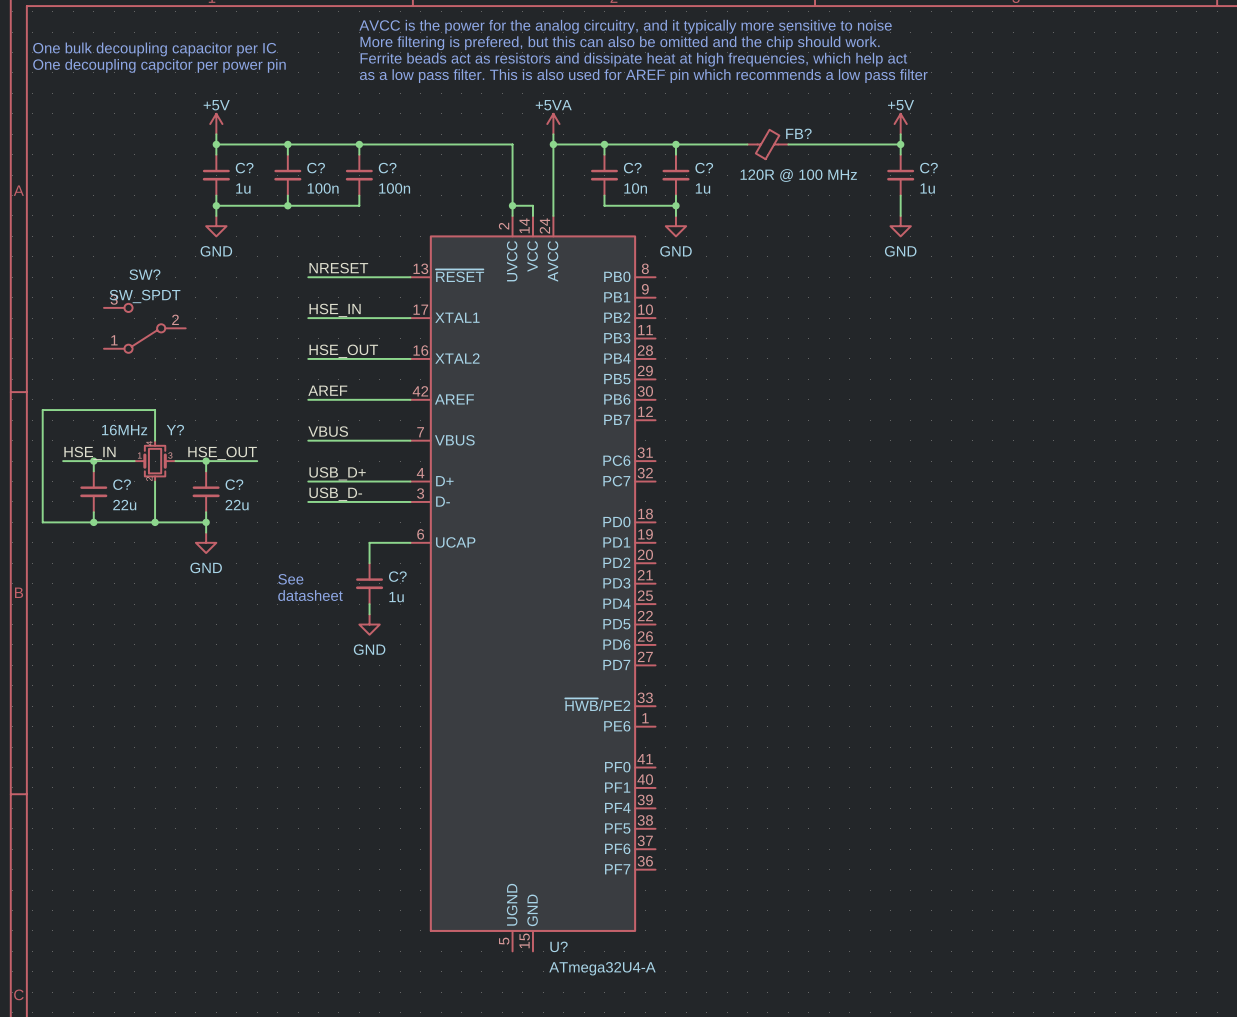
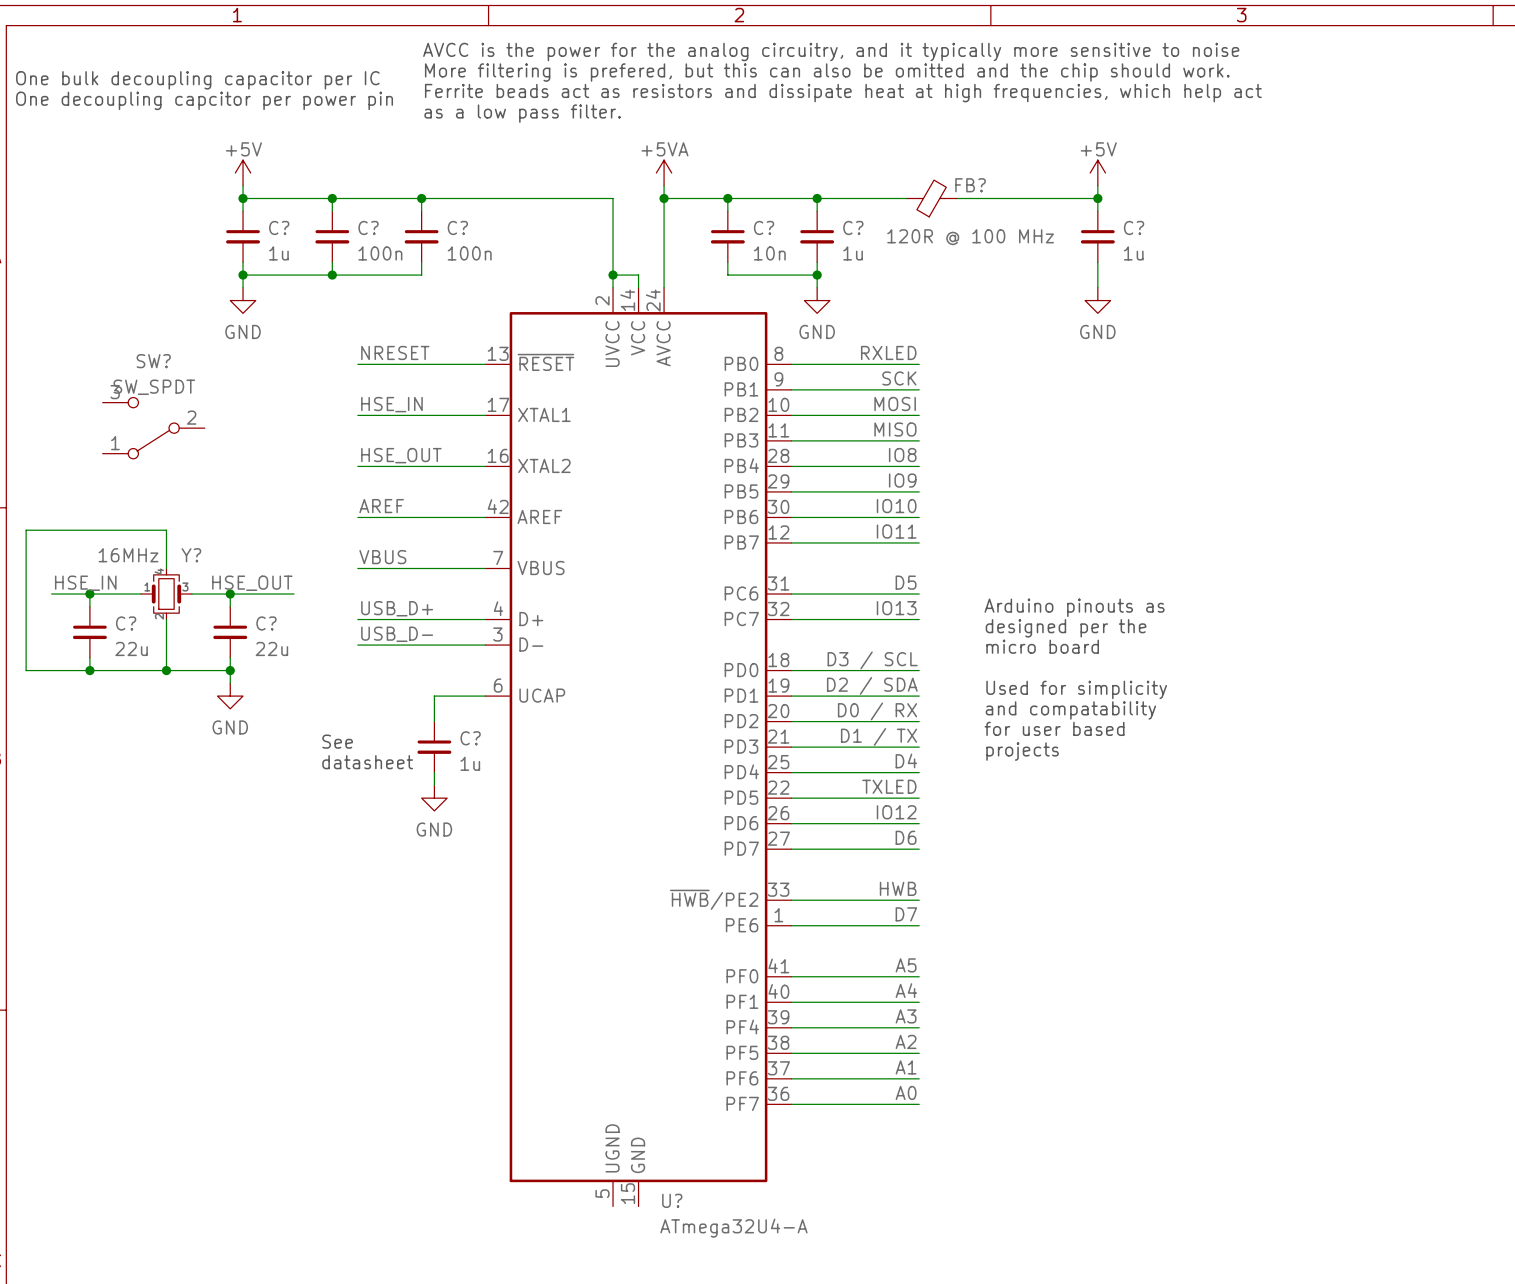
text: as a low pass filter. This is also used for AREF pin which recommends a low pass filter (643, 76) -> as a low pass filter. (522, 113)
label: none -> RXLED (888, 352)
wire: none -> (791, 364) (919, 364)
label: none -> SCK (899, 378)
wire: none -> (791, 389) (919, 389)
label: none -> MOSI (895, 404)
wire: none -> (791, 415) (919, 415)
label: none -> MISO (895, 429)
wire: none -> (791, 440) (919, 440)
label: none -> IO8 (902, 455)
wire: none -> (791, 466) (919, 466)
label: none -> IO9 (902, 480)
wire: none -> (791, 491) (919, 491)
label: none -> IO10 (896, 506)
wire: none -> (791, 517) (919, 517)
label: none -> IO11 (896, 531)
wire: none -> (791, 542) (919, 542)
label: none -> D5 (906, 582)
wire: none -> (791, 594) (919, 594)
text: none -> Arduino pinouts as (1074, 607)
label: none -> IO13 (896, 608)
wire: none -> (791, 619) (919, 619)
text: none -> designed per the (1066, 628)
text: none -> micro board (1042, 646)
label: none -> D3 / SCL (872, 660)
wire: none -> (791, 670) (919, 670)
label: none -> D2 / SDA (872, 685)
text: none -> Used for simplicity (1076, 689)
wire: none -> (791, 696) (919, 696)
label: none -> D0 / RX (877, 711)
text: none -> and compatability (1070, 710)
wire: none -> (791, 721) (919, 721)
text: none -> for user based (1054, 728)
label: none -> D1 / TX (879, 736)
wire: none -> (791, 747) (919, 747)
text: none -> projects (1022, 751)
label: none -> D4 (906, 760)
wire: none -> (791, 772) (919, 772)
label: none -> TXLED (889, 786)
wire: none -> (791, 798) (919, 798)
label: none -> IO12 (896, 812)
wire: none -> (791, 823) (919, 823)
label: none -> D6 (906, 837)
wire: none -> (791, 849) (919, 849)
label: none -> HWB (898, 888)
wire: none -> (791, 900) (919, 900)
label: none -> D7 (906, 914)
wire: none -> (791, 925) (919, 925)
label: none -> A5 (906, 965)
wire: none -> (791, 976) (919, 976)
label: none -> A4 (906, 990)
wire: none -> (791, 1002) (919, 1002)
label: none -> A3 (906, 1016)
wire: none -> (791, 1027) (919, 1027)
label: none -> A2 (906, 1041)
wire: none -> (791, 1053) (919, 1053)
label: none -> A1 (906, 1067)
wire: none -> (791, 1078) (919, 1078)
label: none -> A0 (906, 1092)
wire: none -> (791, 1104) (919, 1104)

